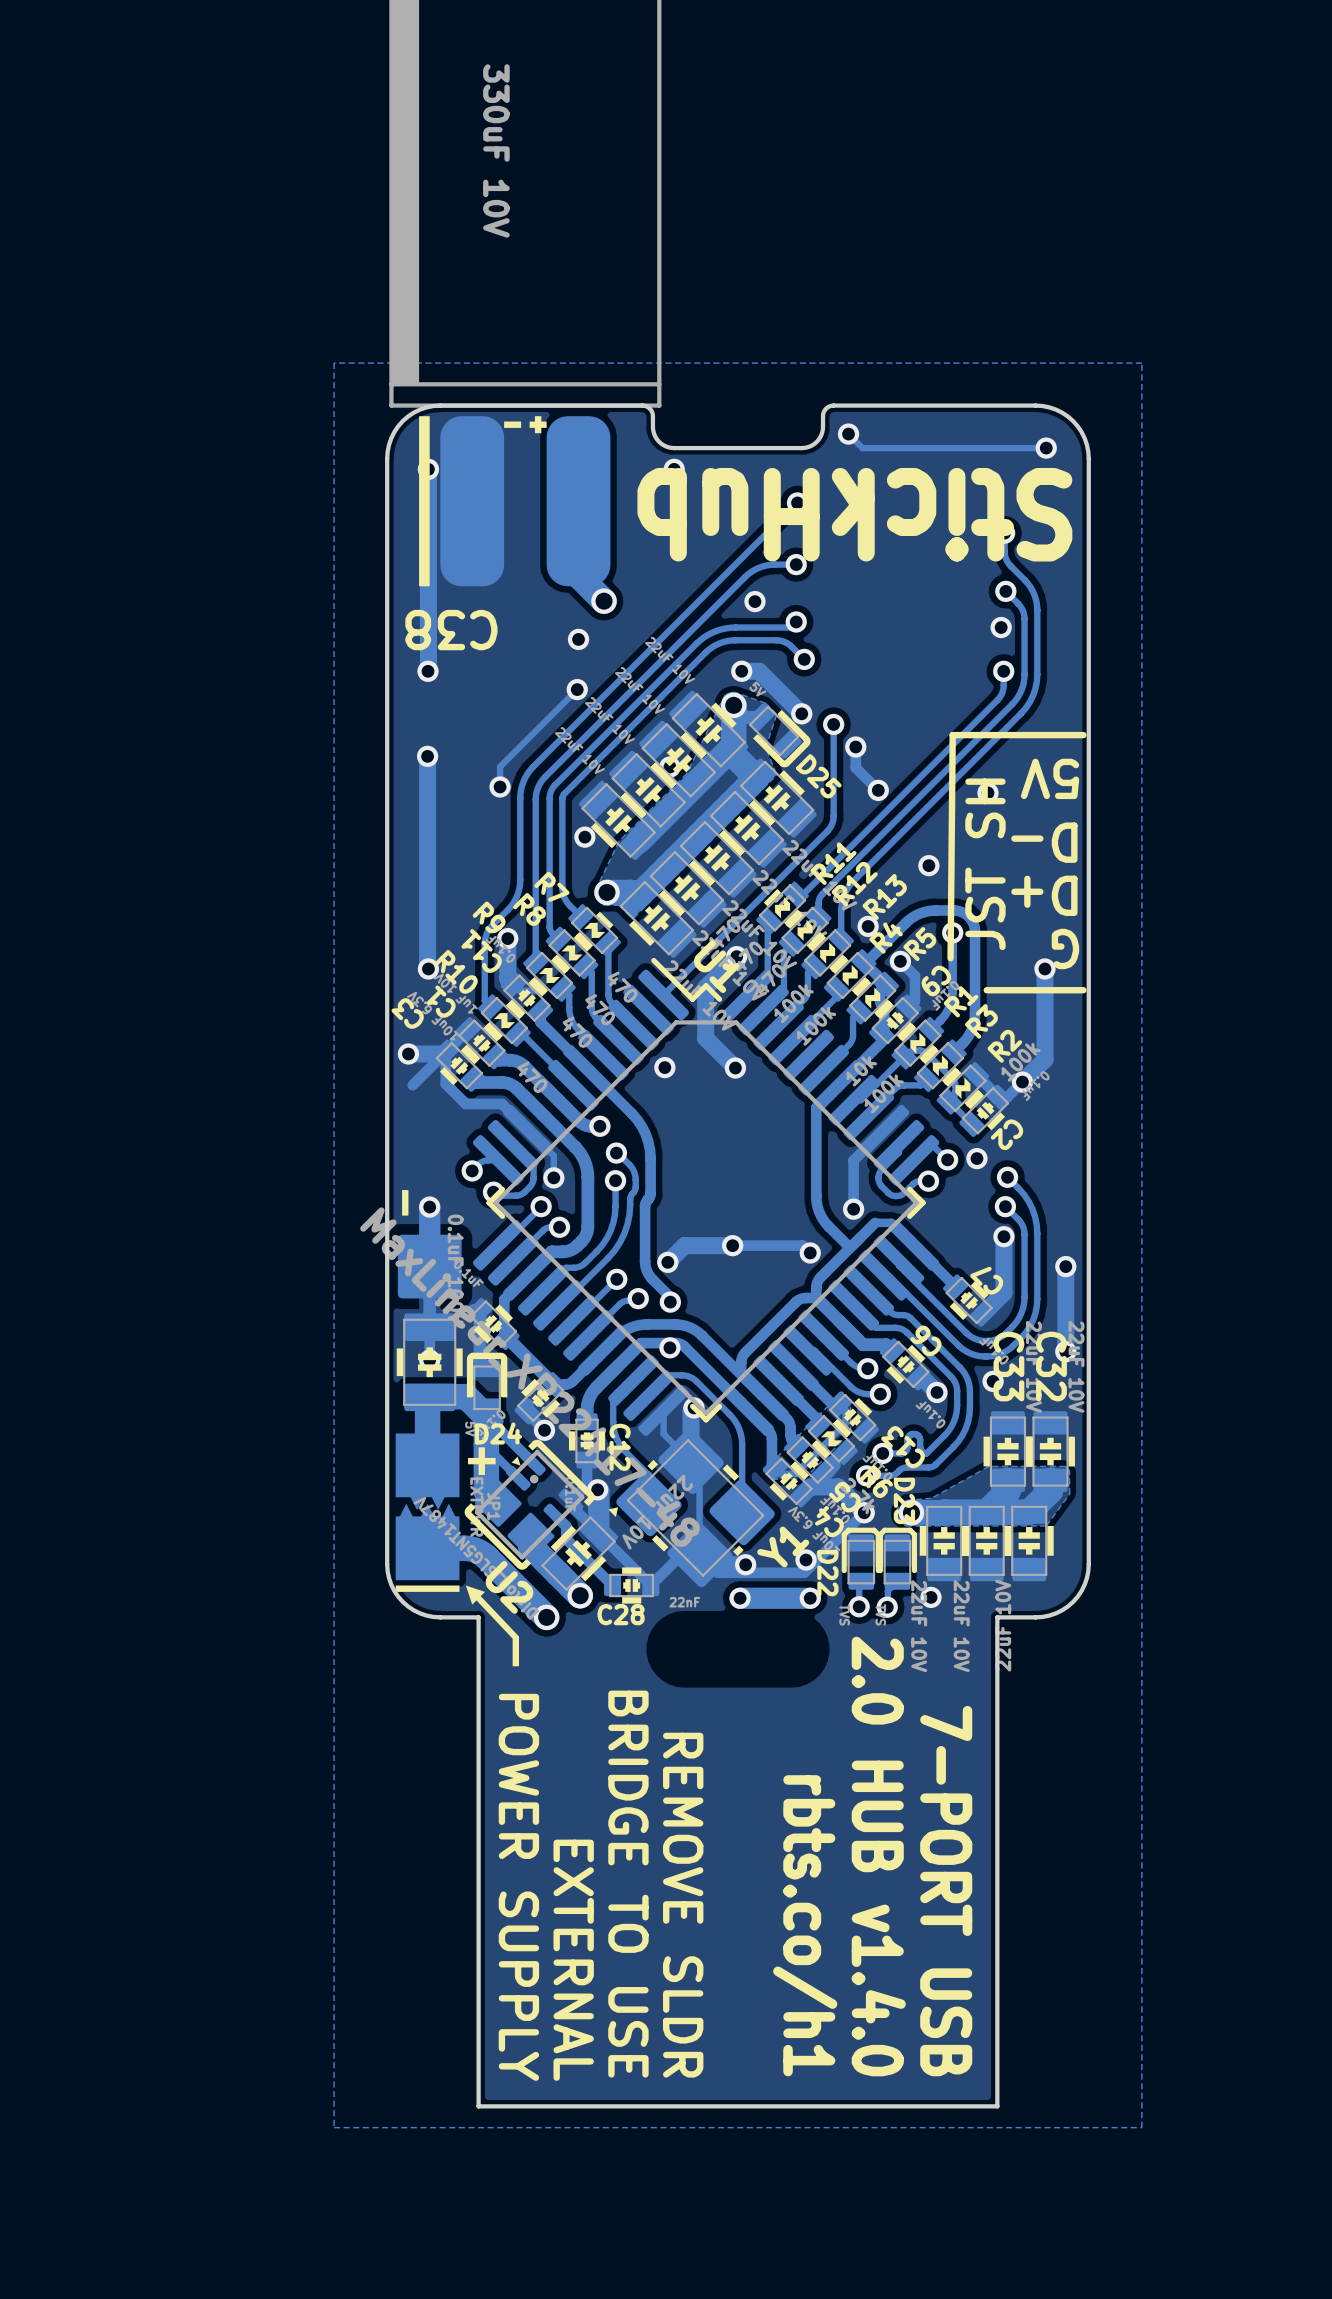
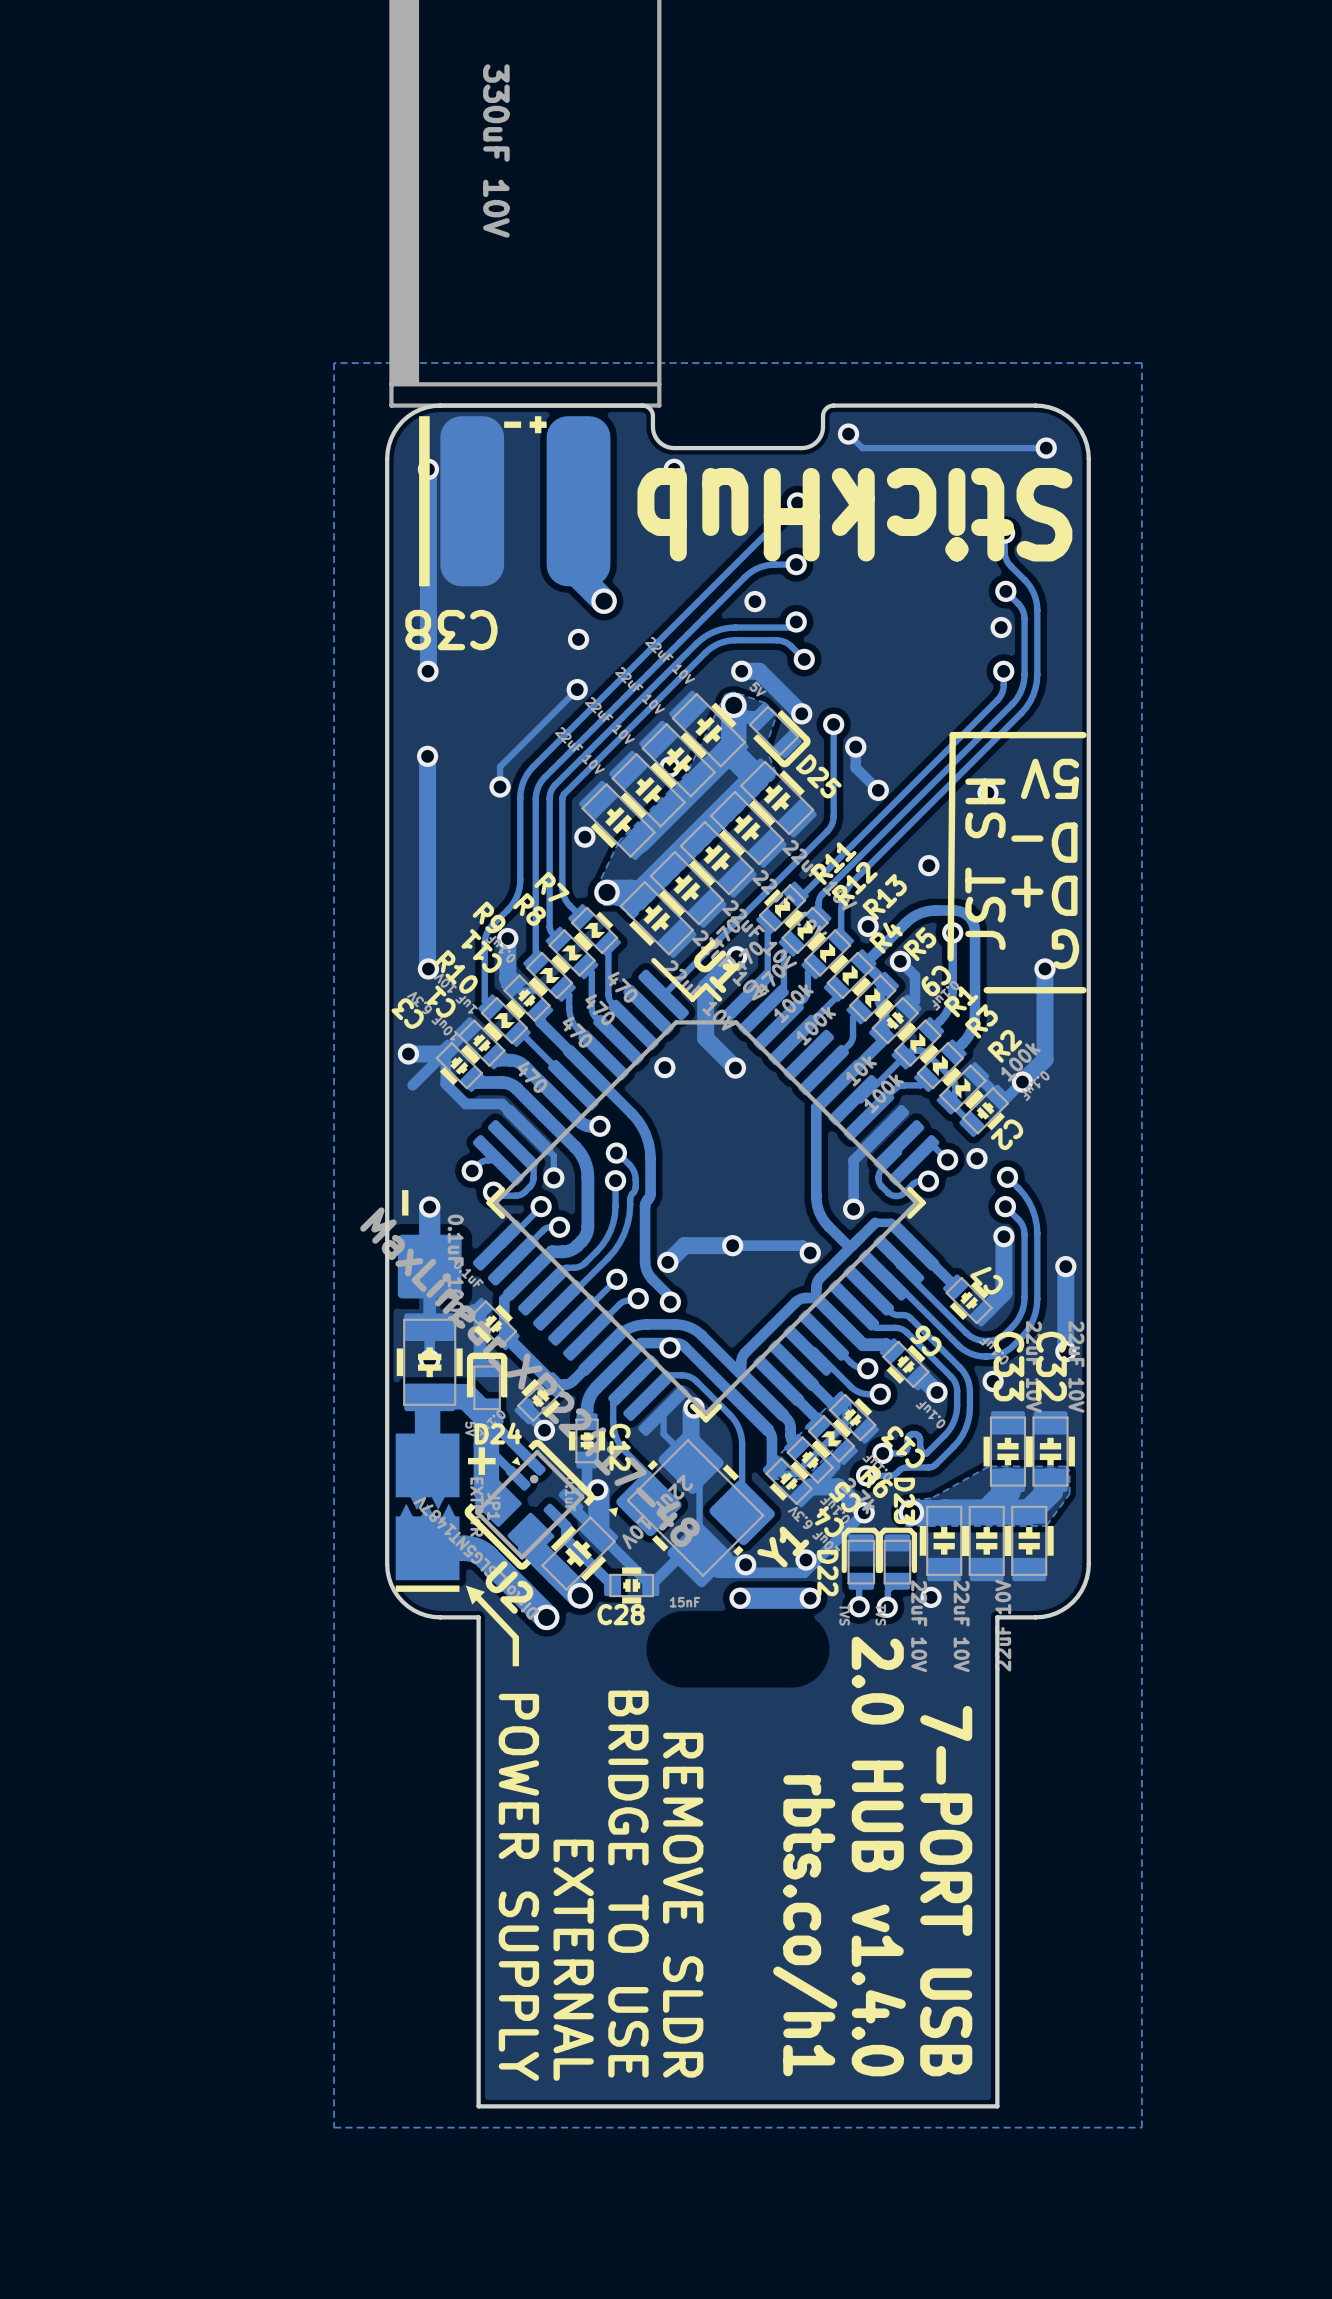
C28 value: 22nF (684, 1602) -> 15nF (685, 1602)

